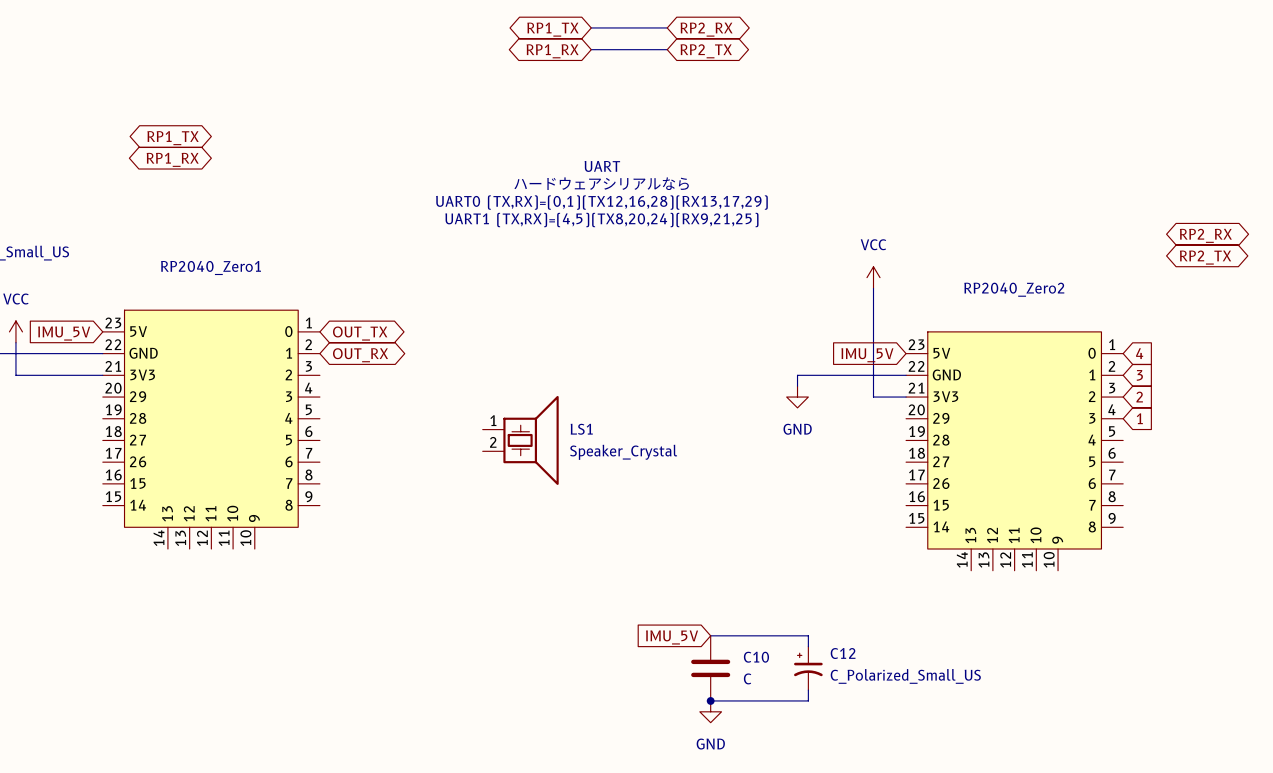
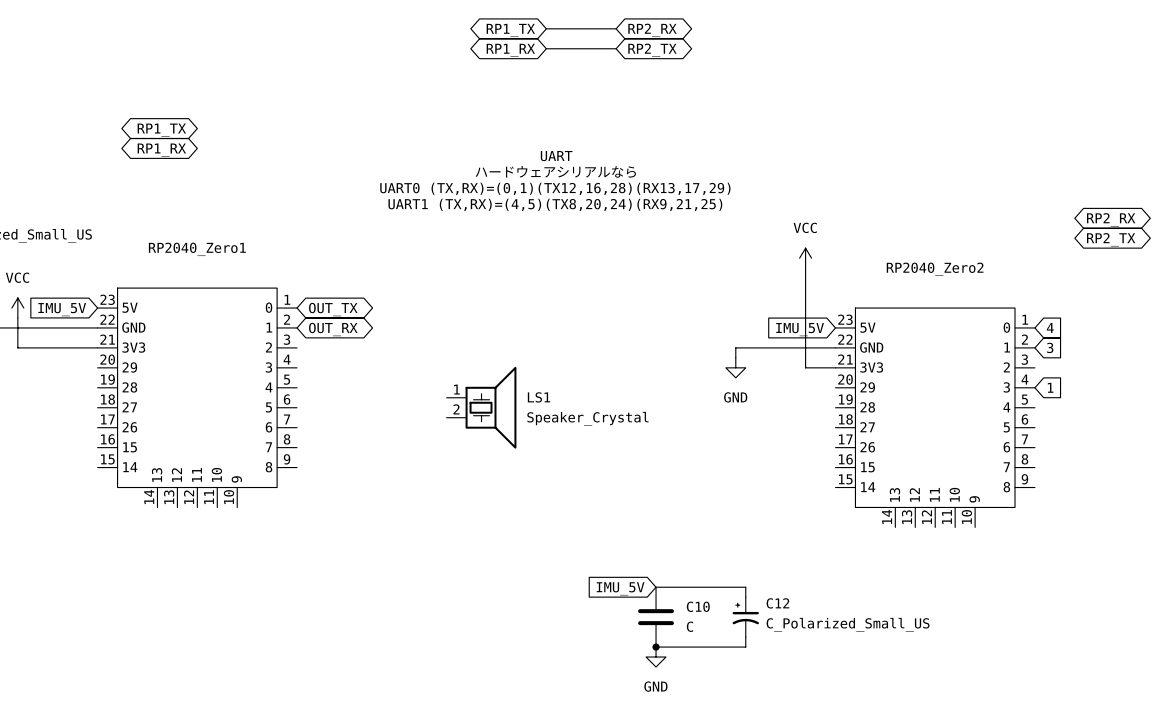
global label: 2 (1139, 397) -> none

